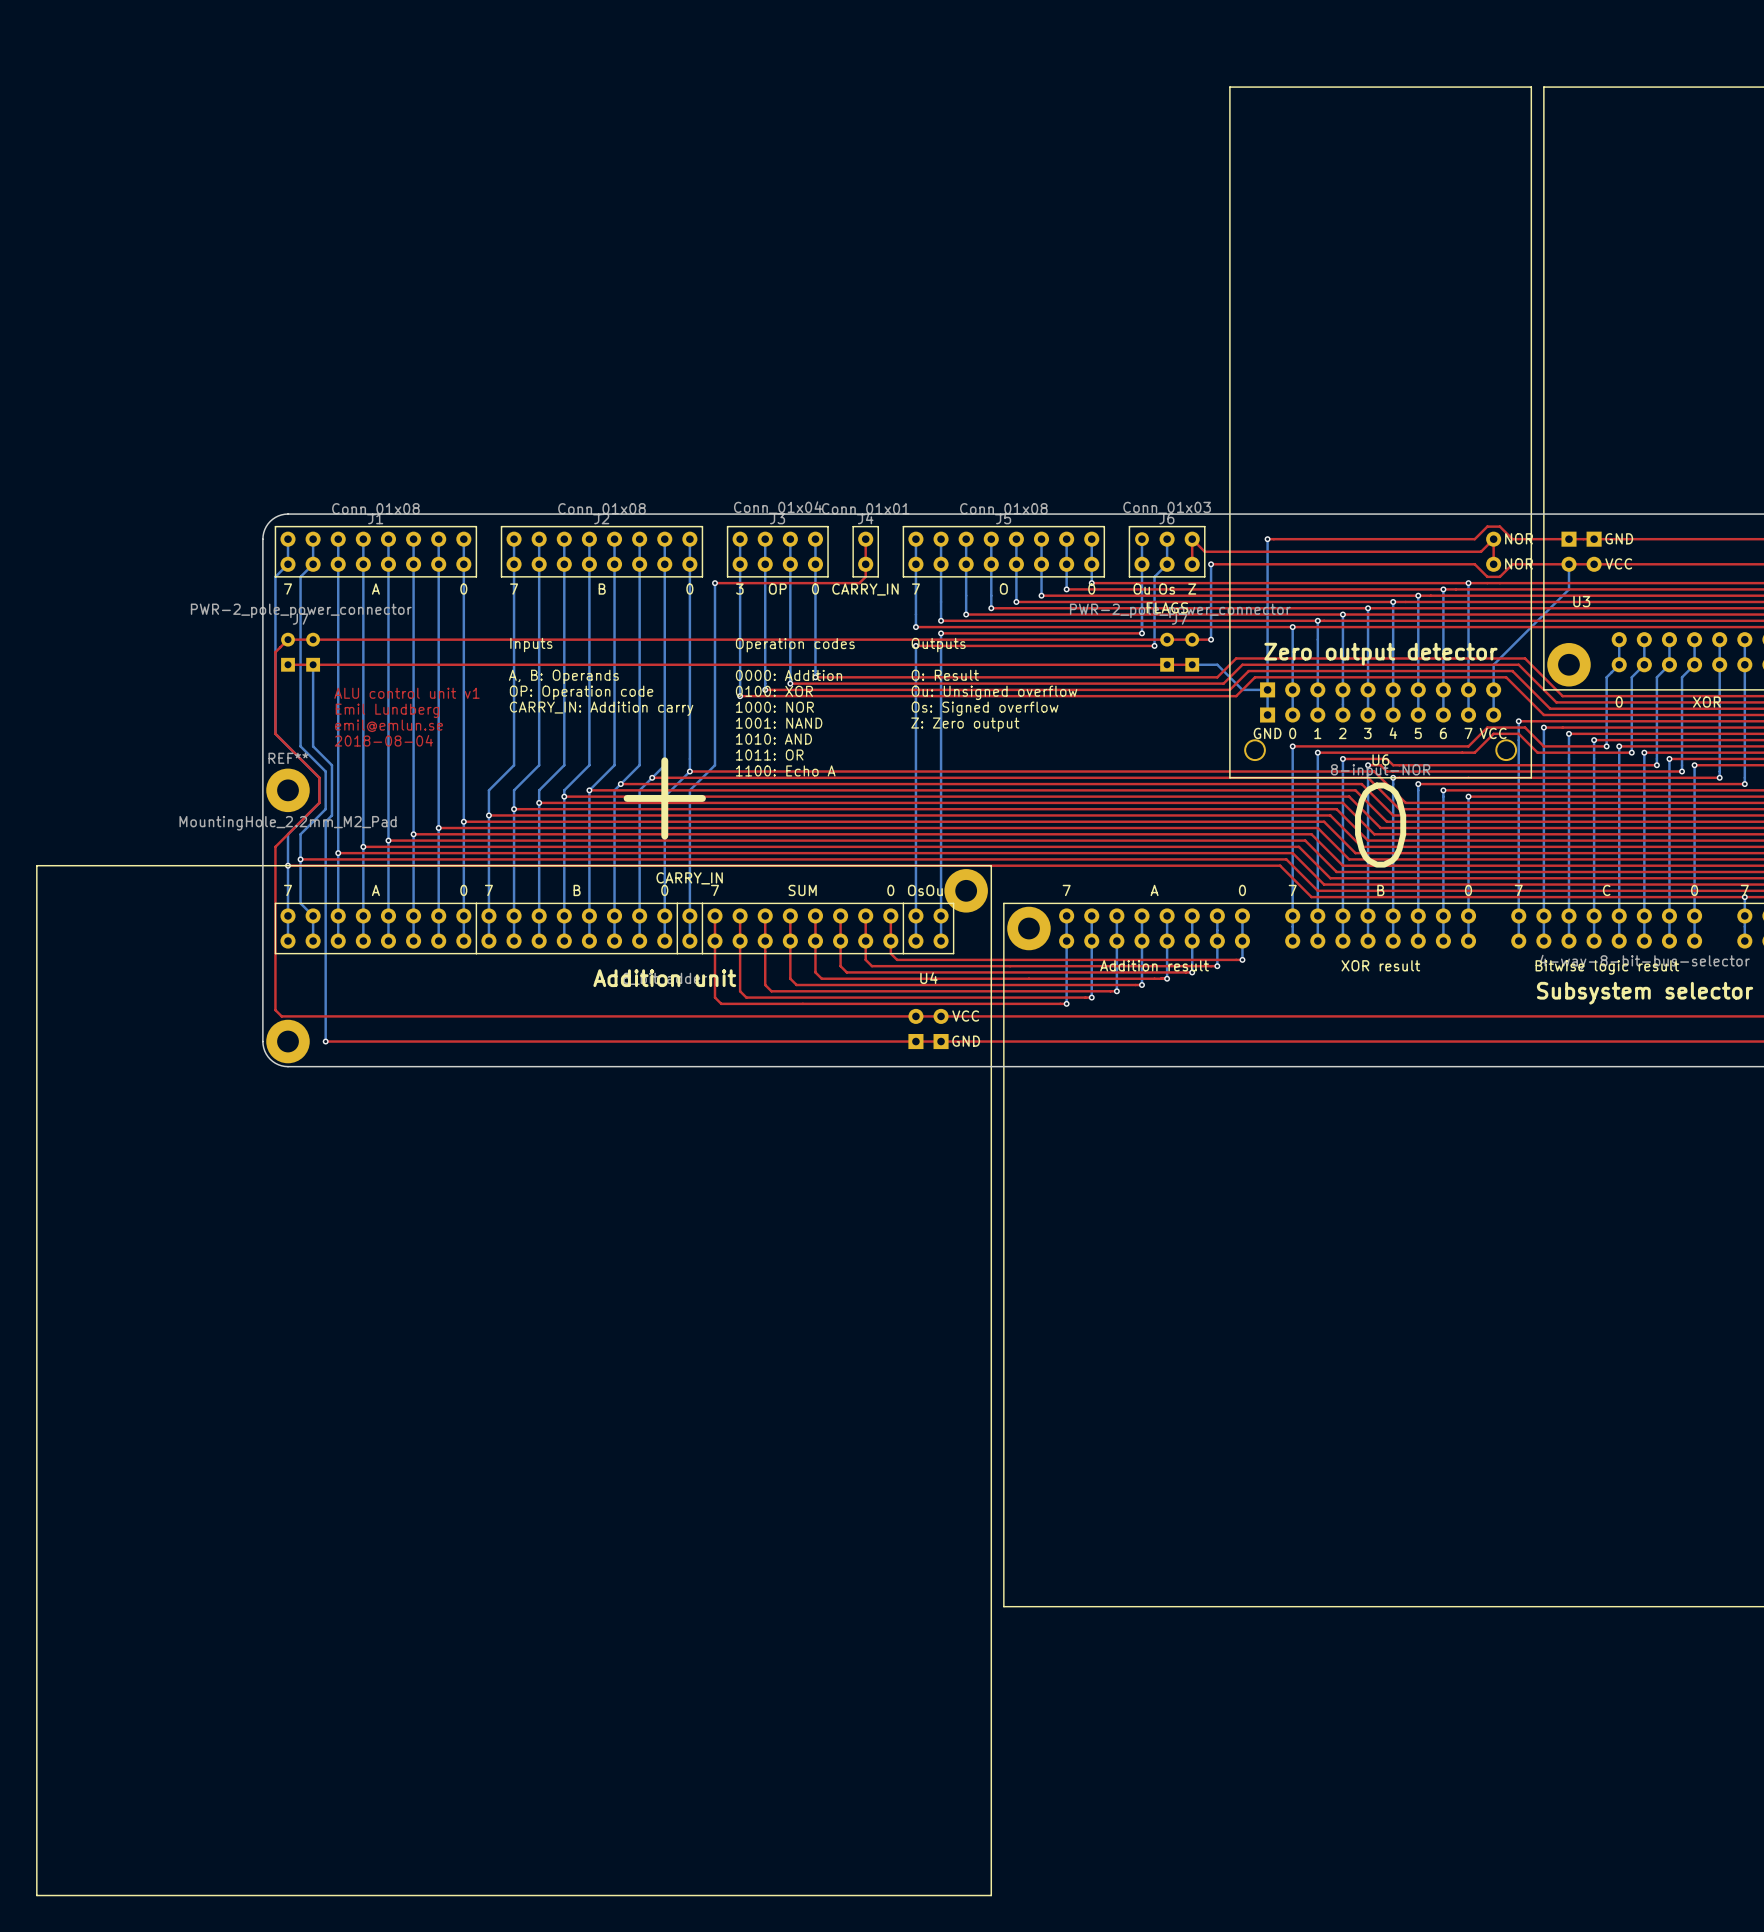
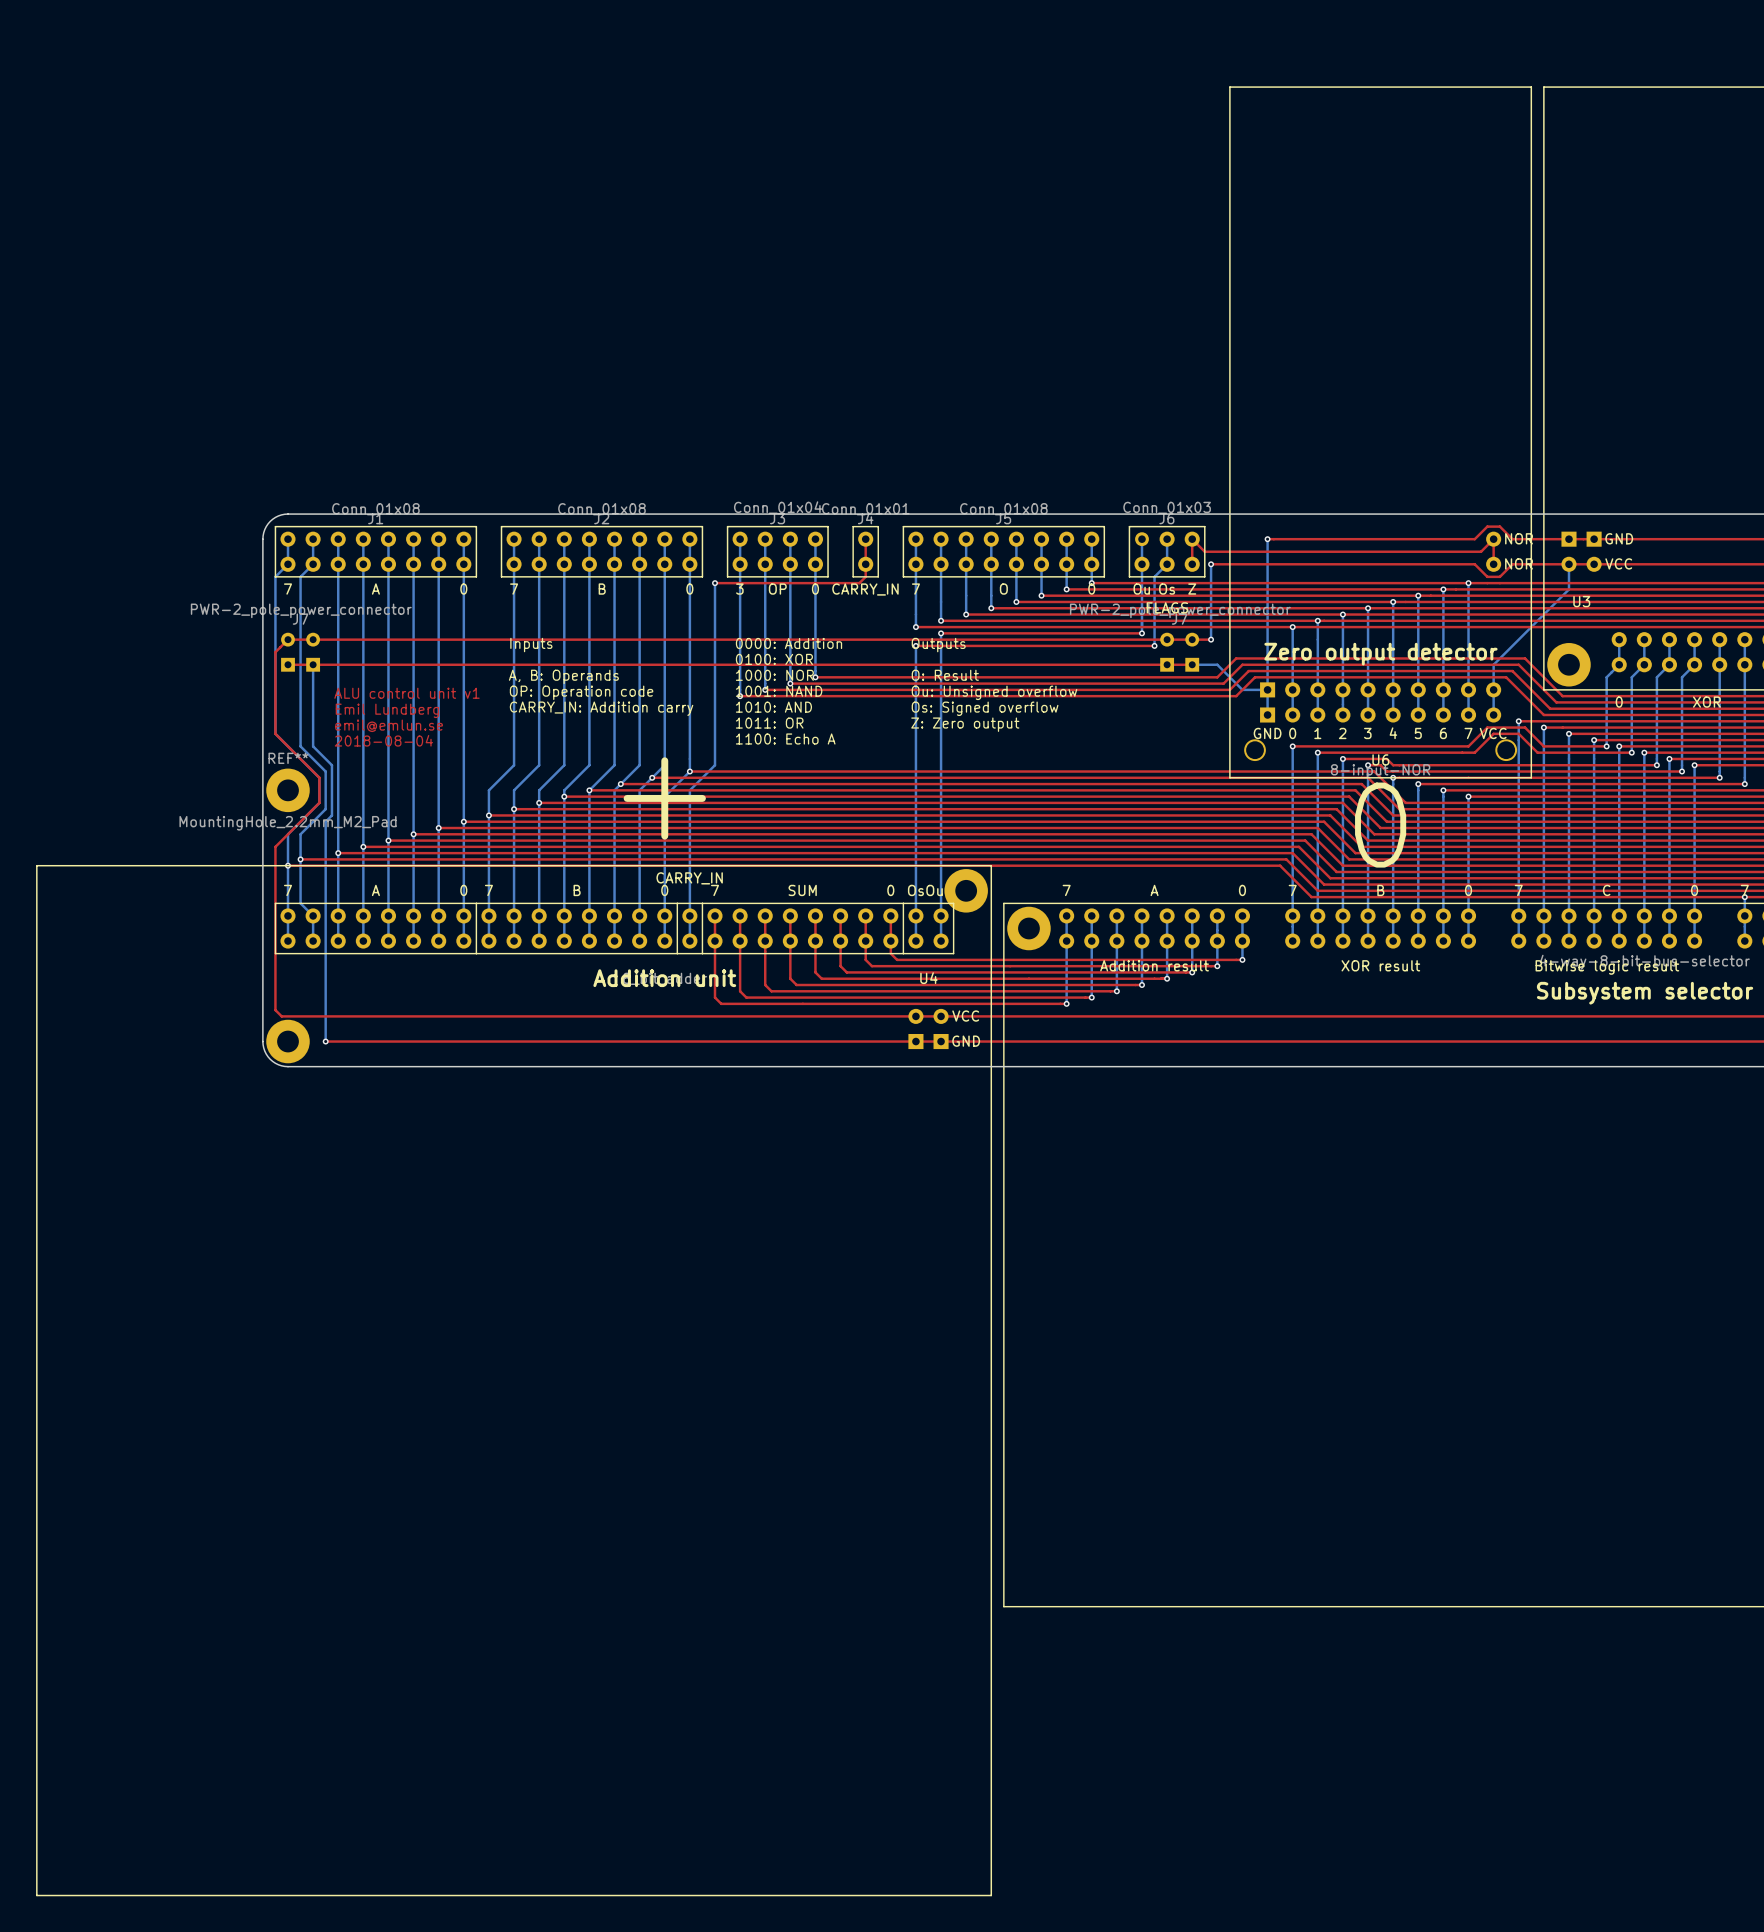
text: Operation codes (795, 645) -> 0000: Addition (789, 643)
text: none -> 0100: XOR (774, 659)
text: 0000: Addition (789, 675) -> 1000: NOR (774, 675)
text: 0100: XOR (774, 691) -> 1001: NAND (779, 691)
text: 1000: NOR (774, 707) -> 1010: AND (773, 707)
text: 1001: NAND (779, 723) -> 1011: OR (769, 723)
text: 1010: AND (773, 739) -> 1100: Echo A (785, 739)
text: 1011: OR (769, 755) -> none
text: 1100: Echo A (785, 770) -> none

